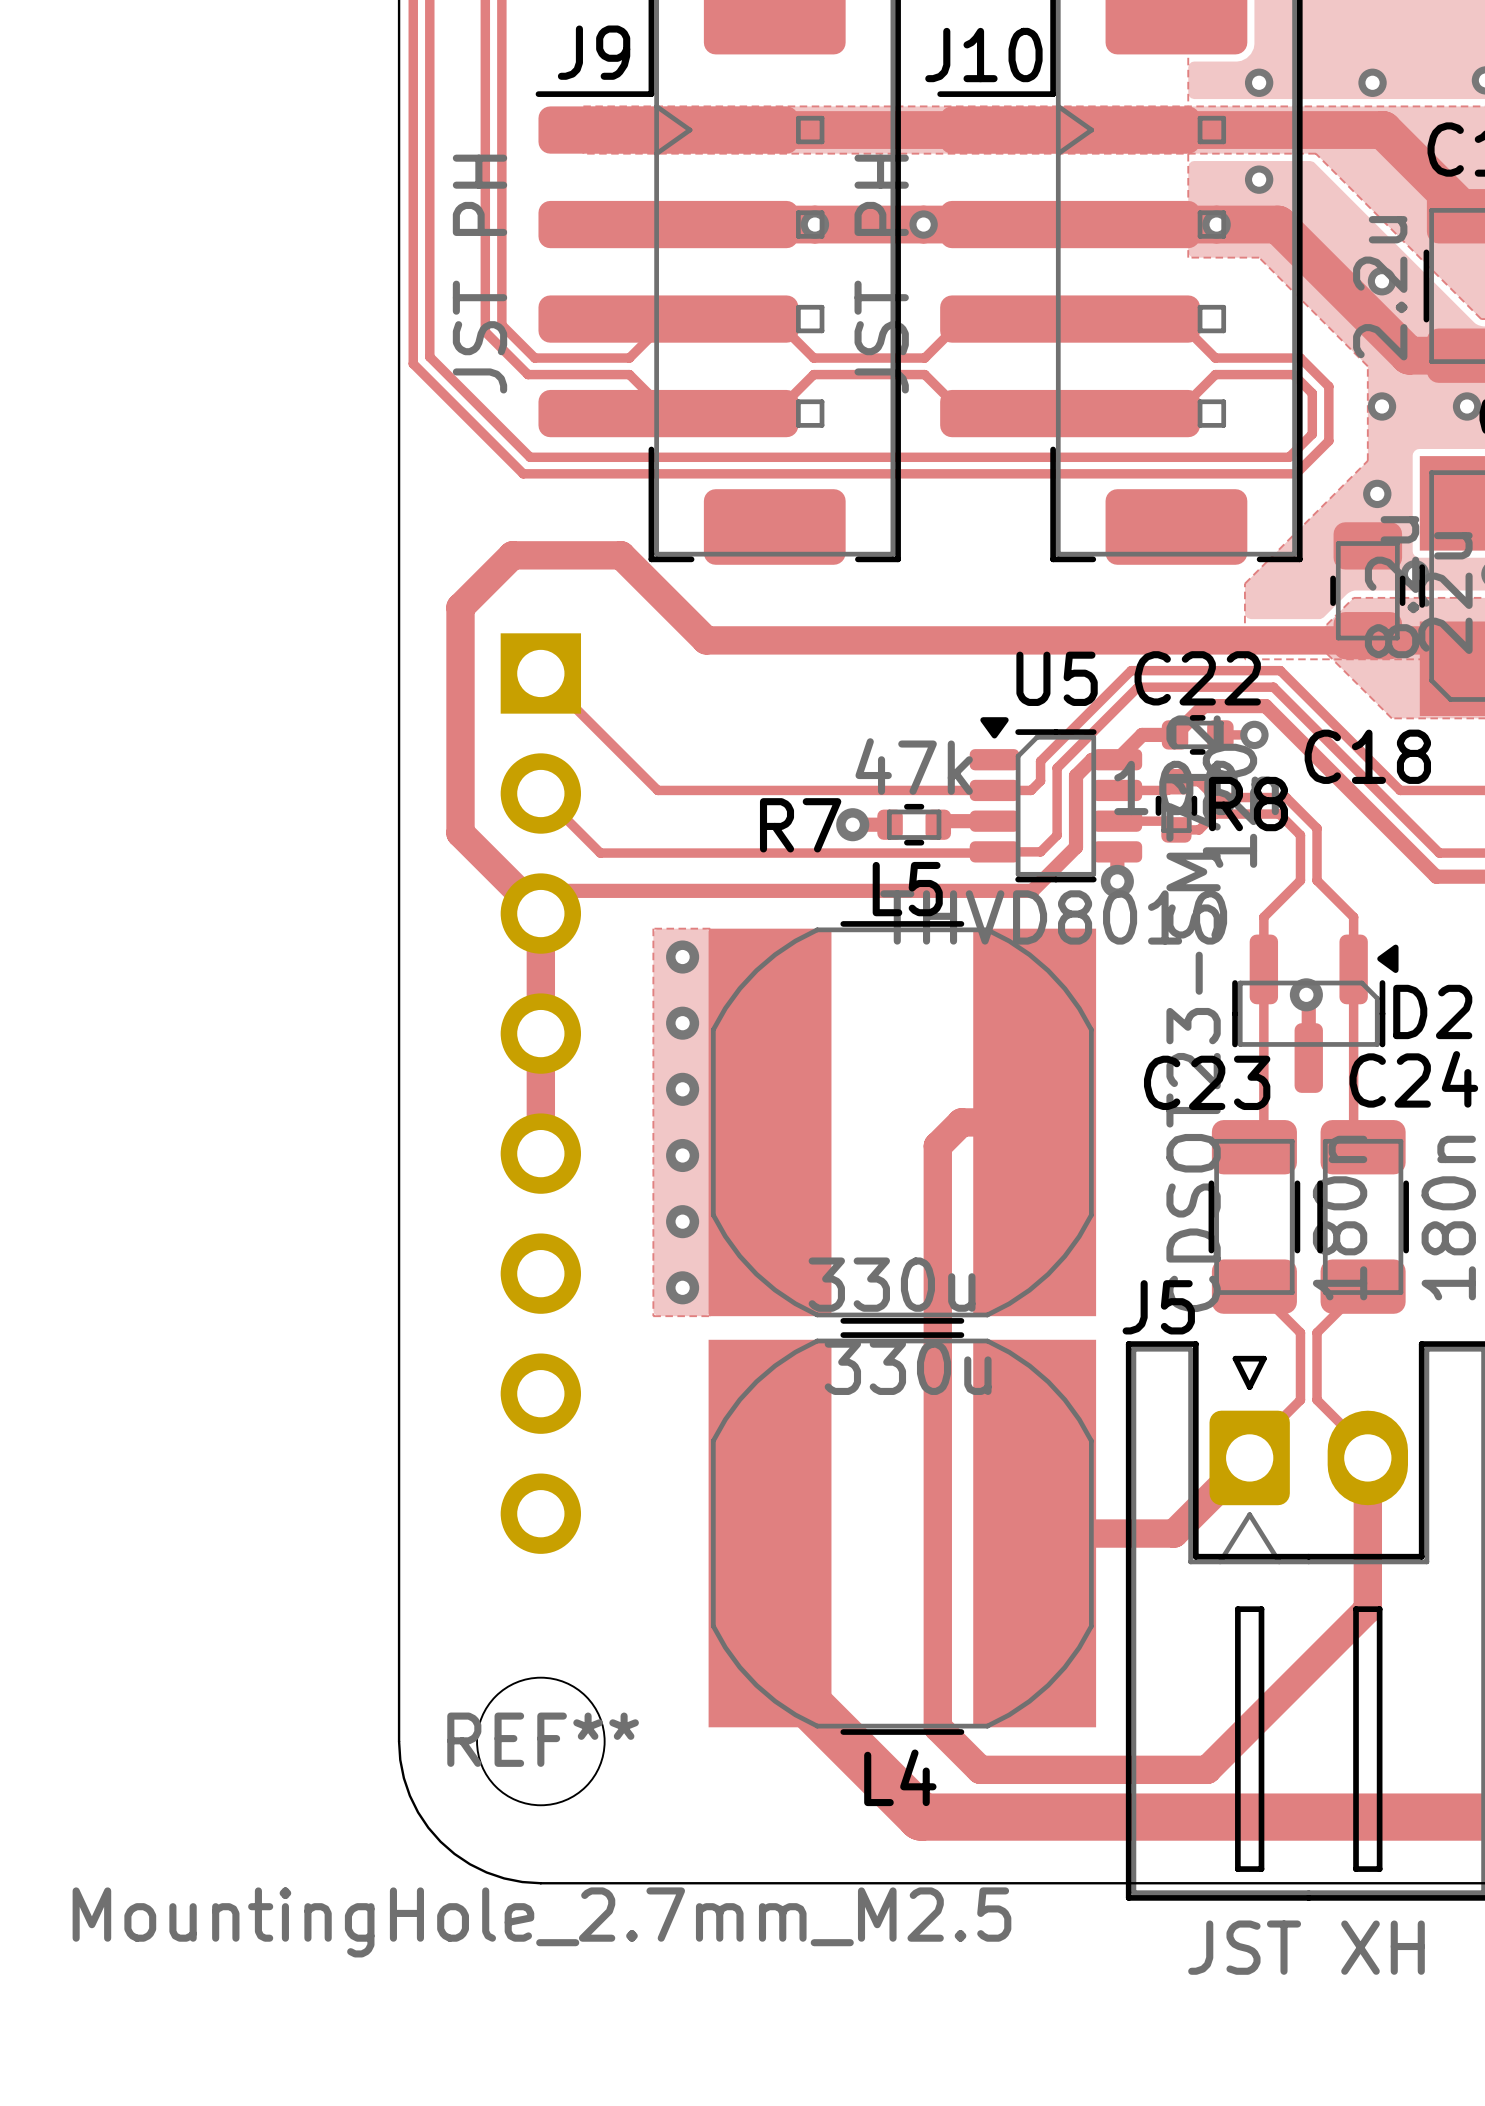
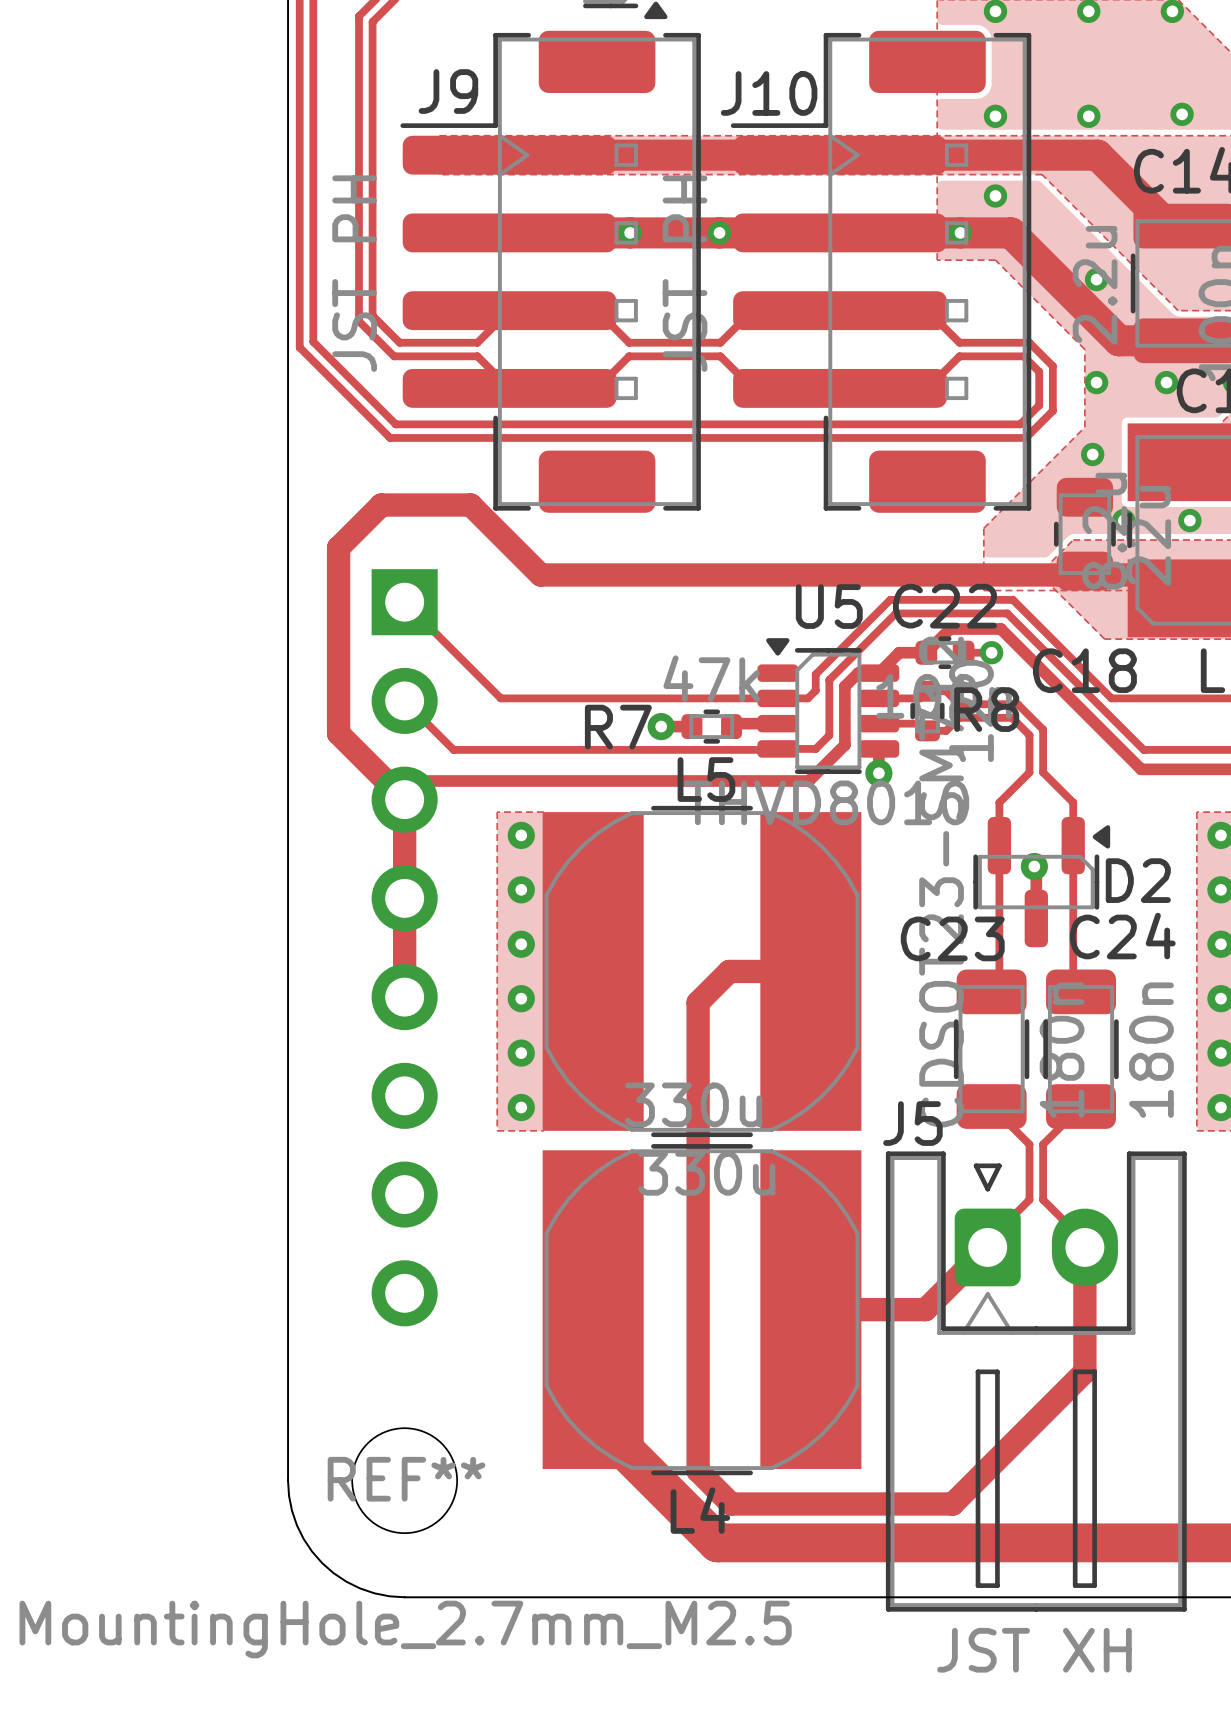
track: (961, 1122) (937, 1146) (937, 1727) (980, 1769) -> (750, 971) (729, 971) (698, 1002) (698, 1470) (731, 1503) (766, 1503)

